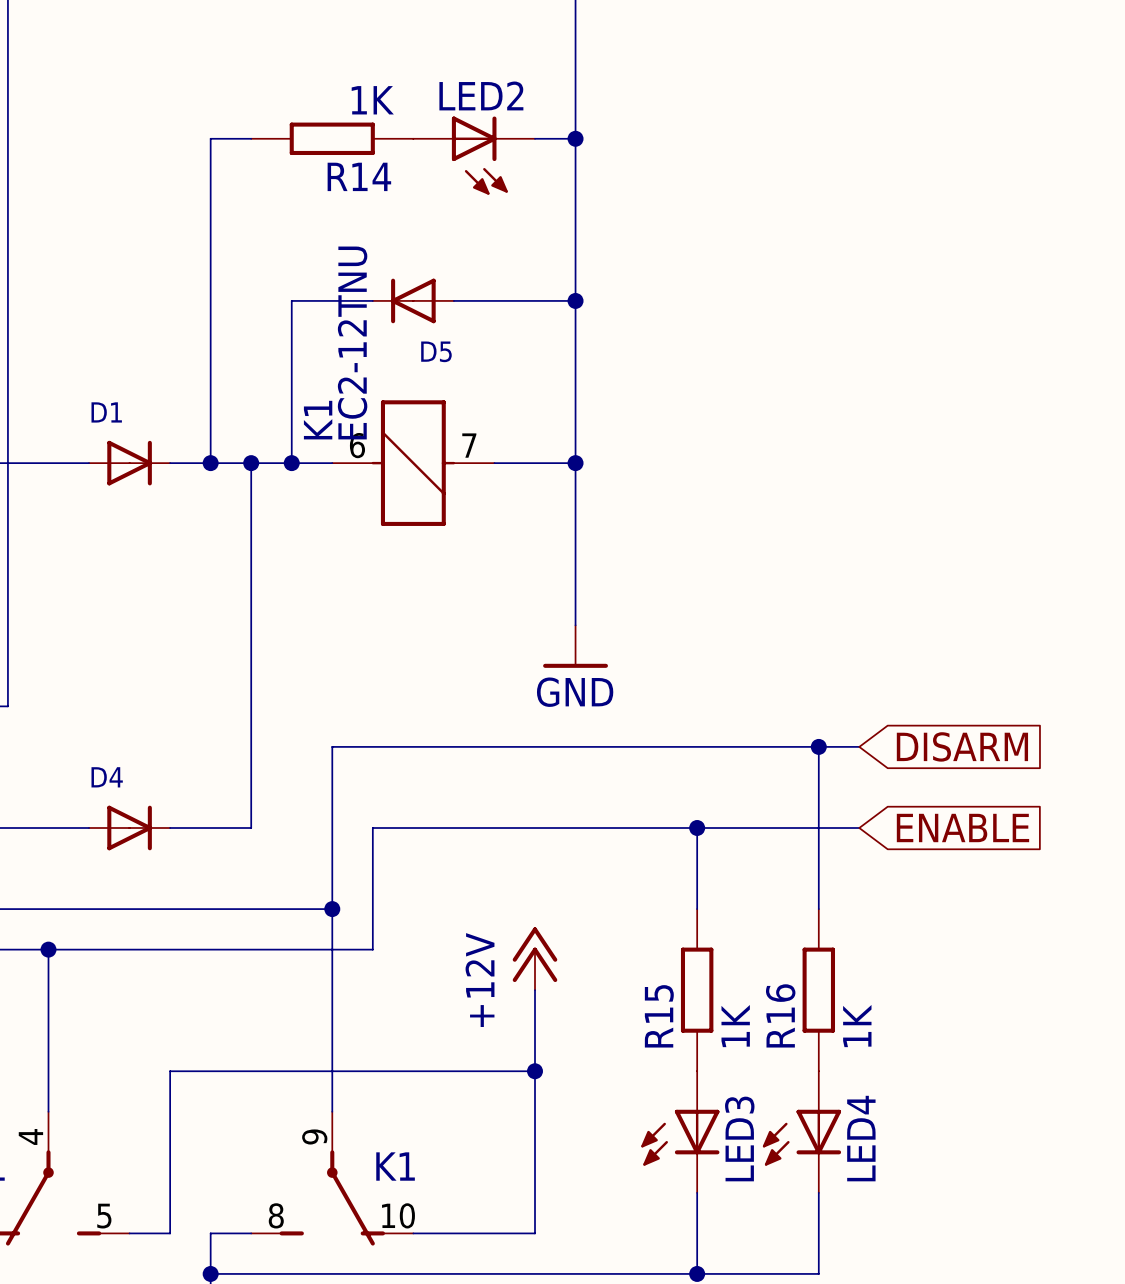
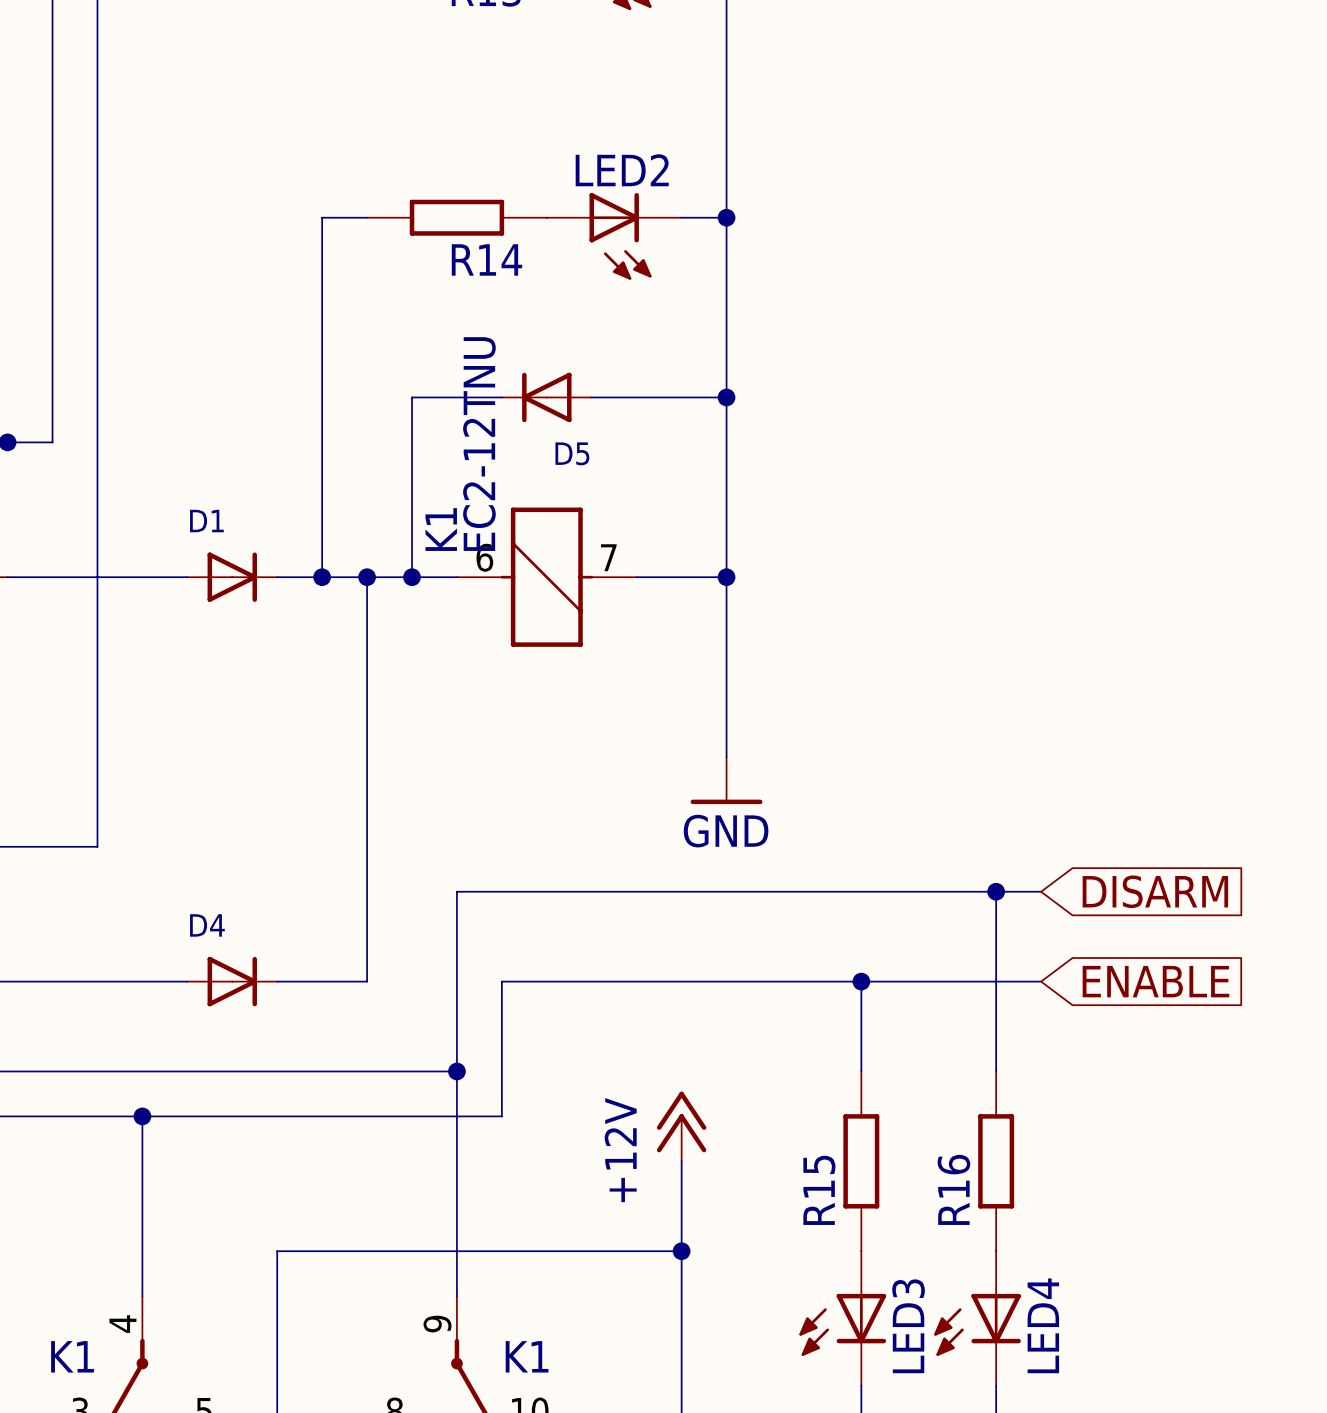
R14 value: 1K (372, 100) -> none
R15 value: 1K (735, 1026) -> none
R16 value: 1K (857, 1026) -> none

